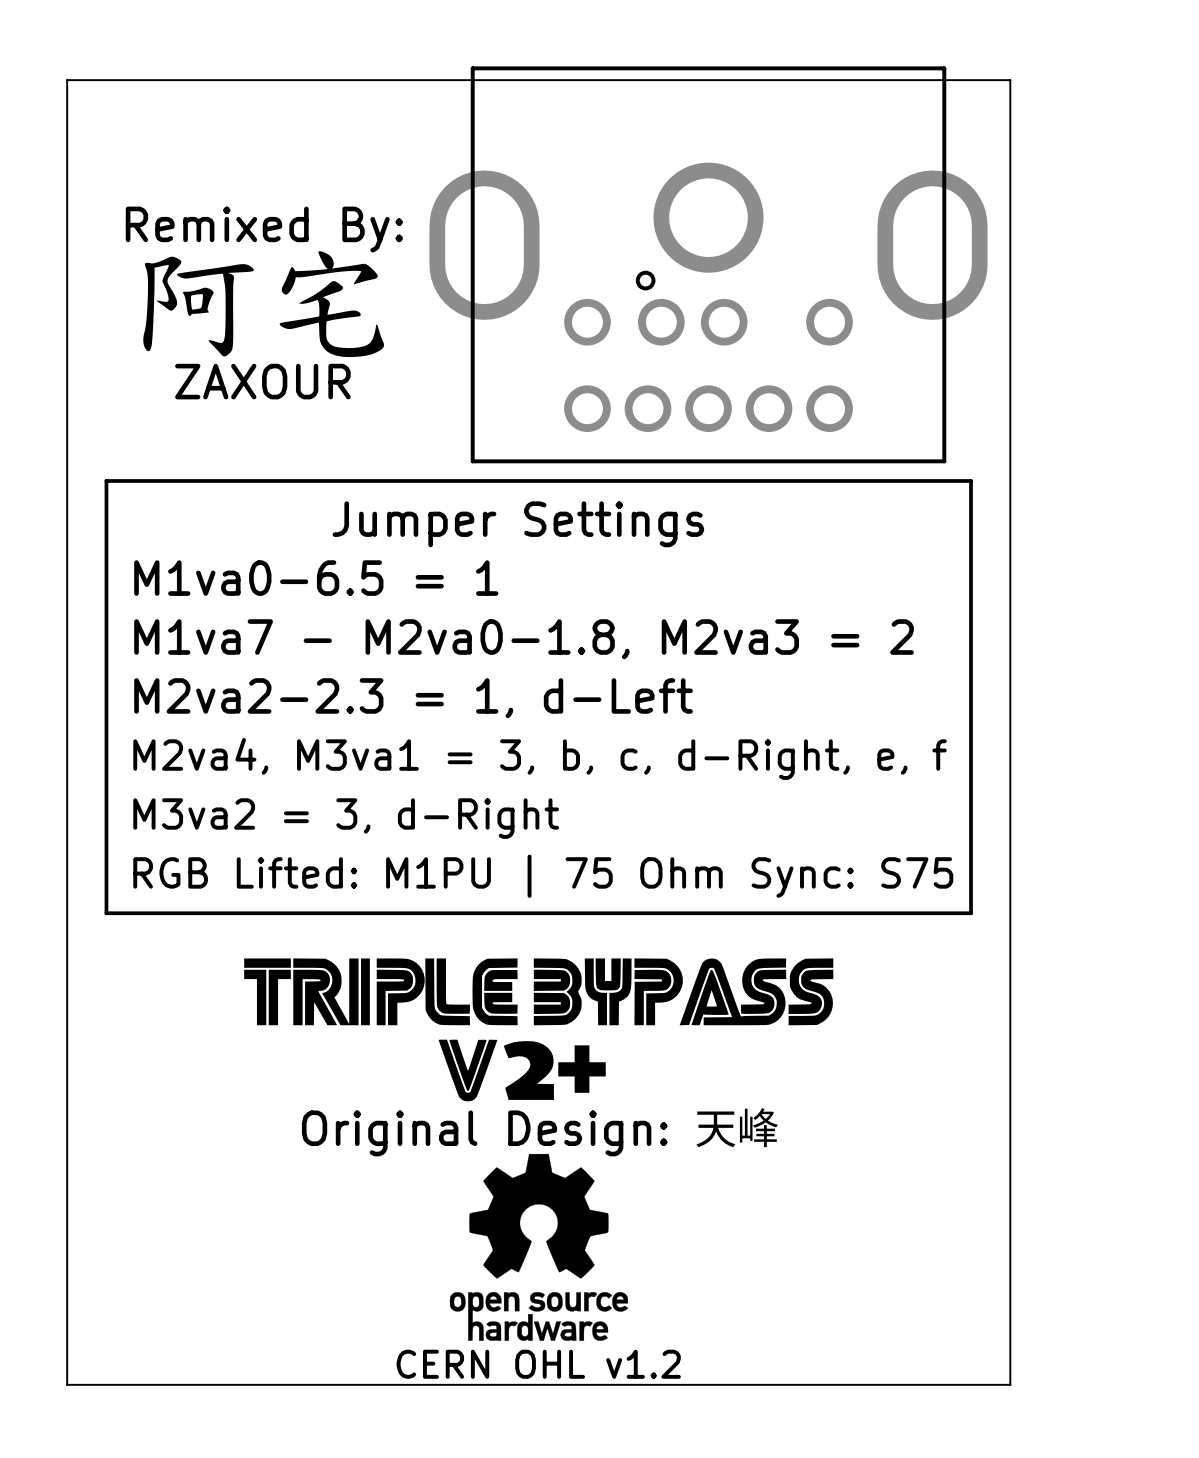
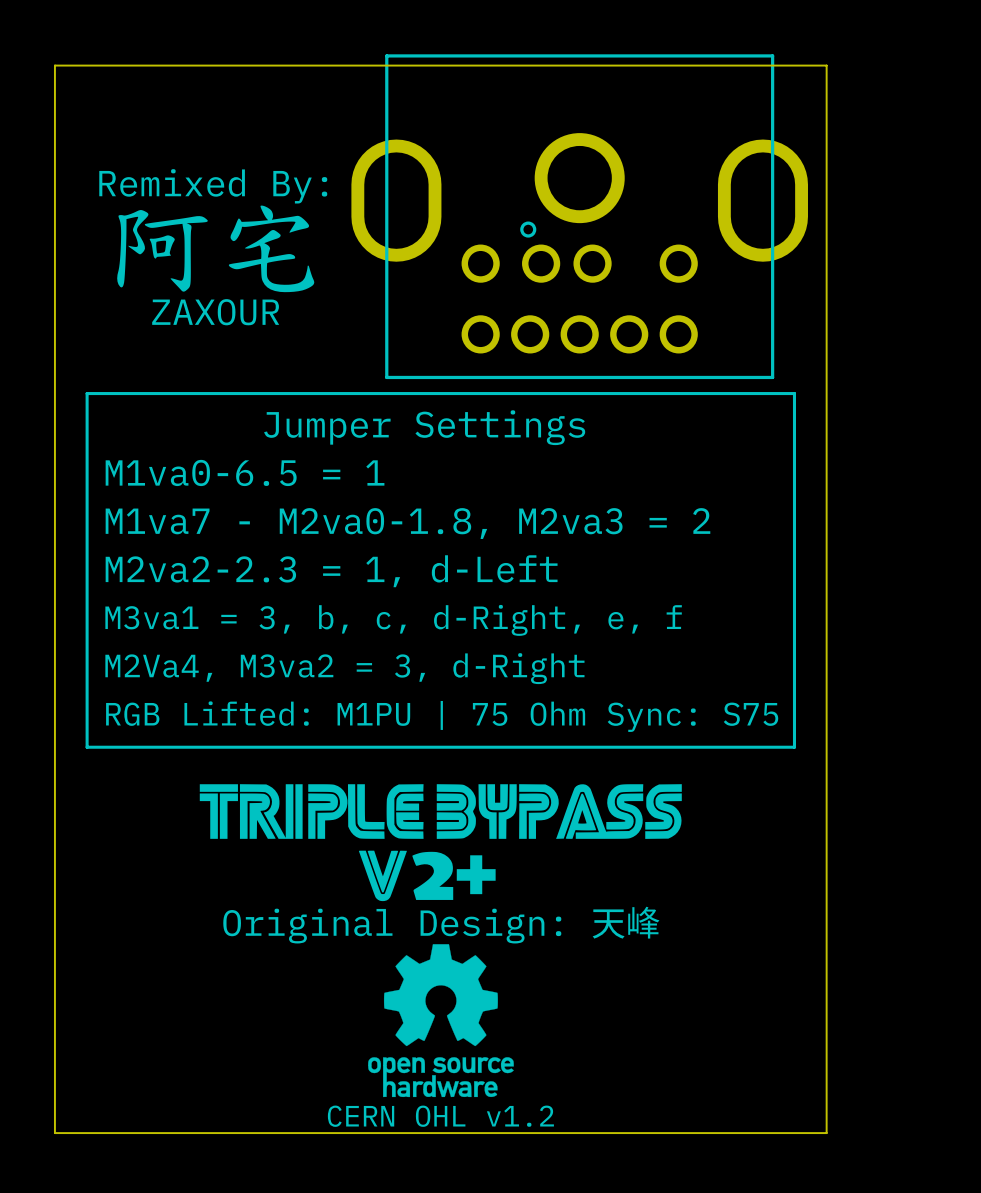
text: M2va4, M3va1 = 3, b, c, d-Right, e, f (540, 758) -> M3va1 = 3, b, c, d-Right, e, f (393, 620)
text: M3va2 = 3, d-Right (346, 818) -> M2Va4, M3va2 = 3, d-Right (344, 668)

